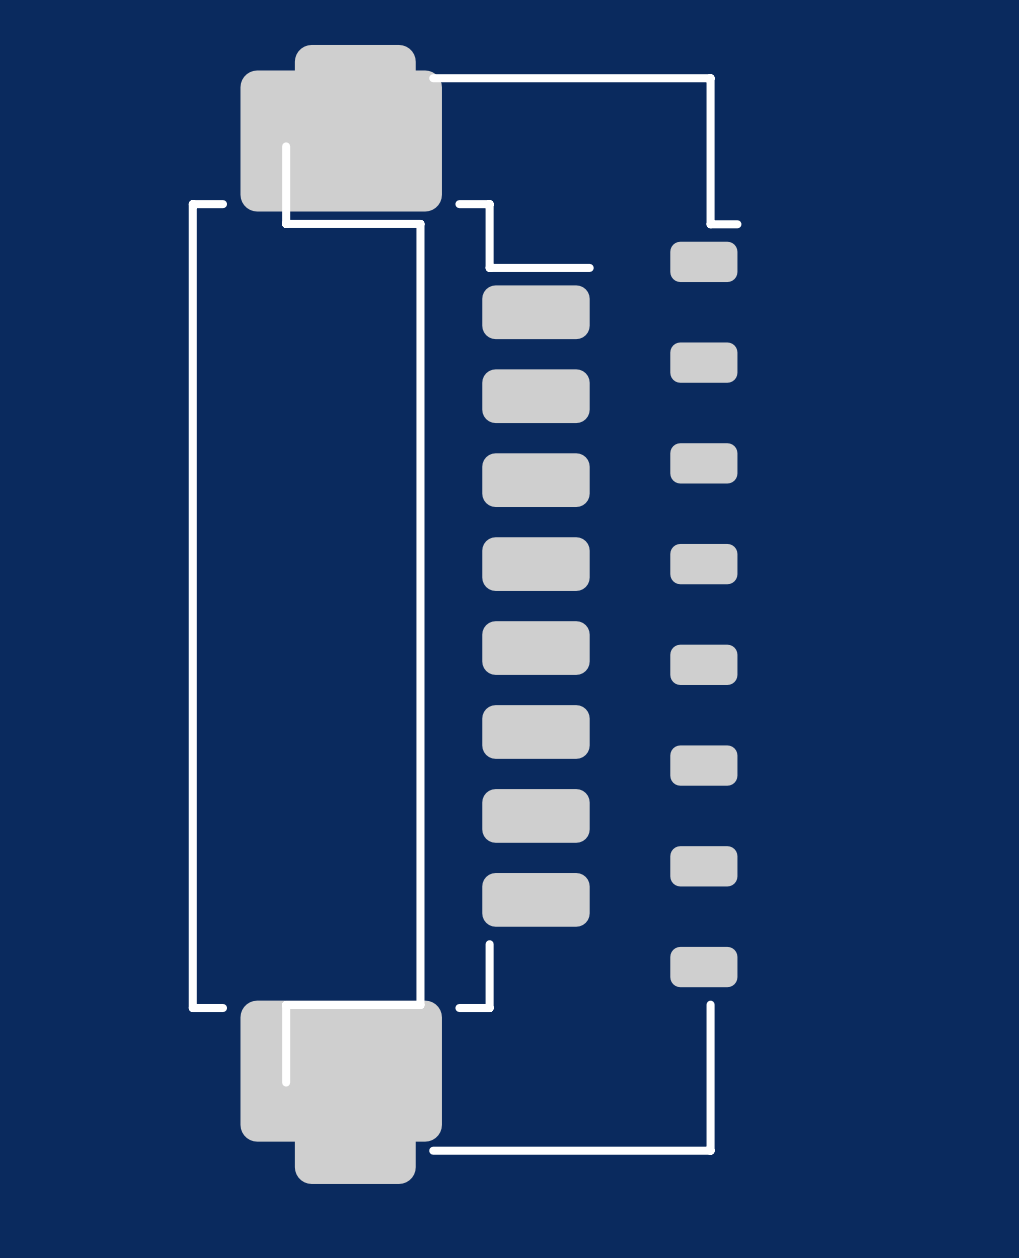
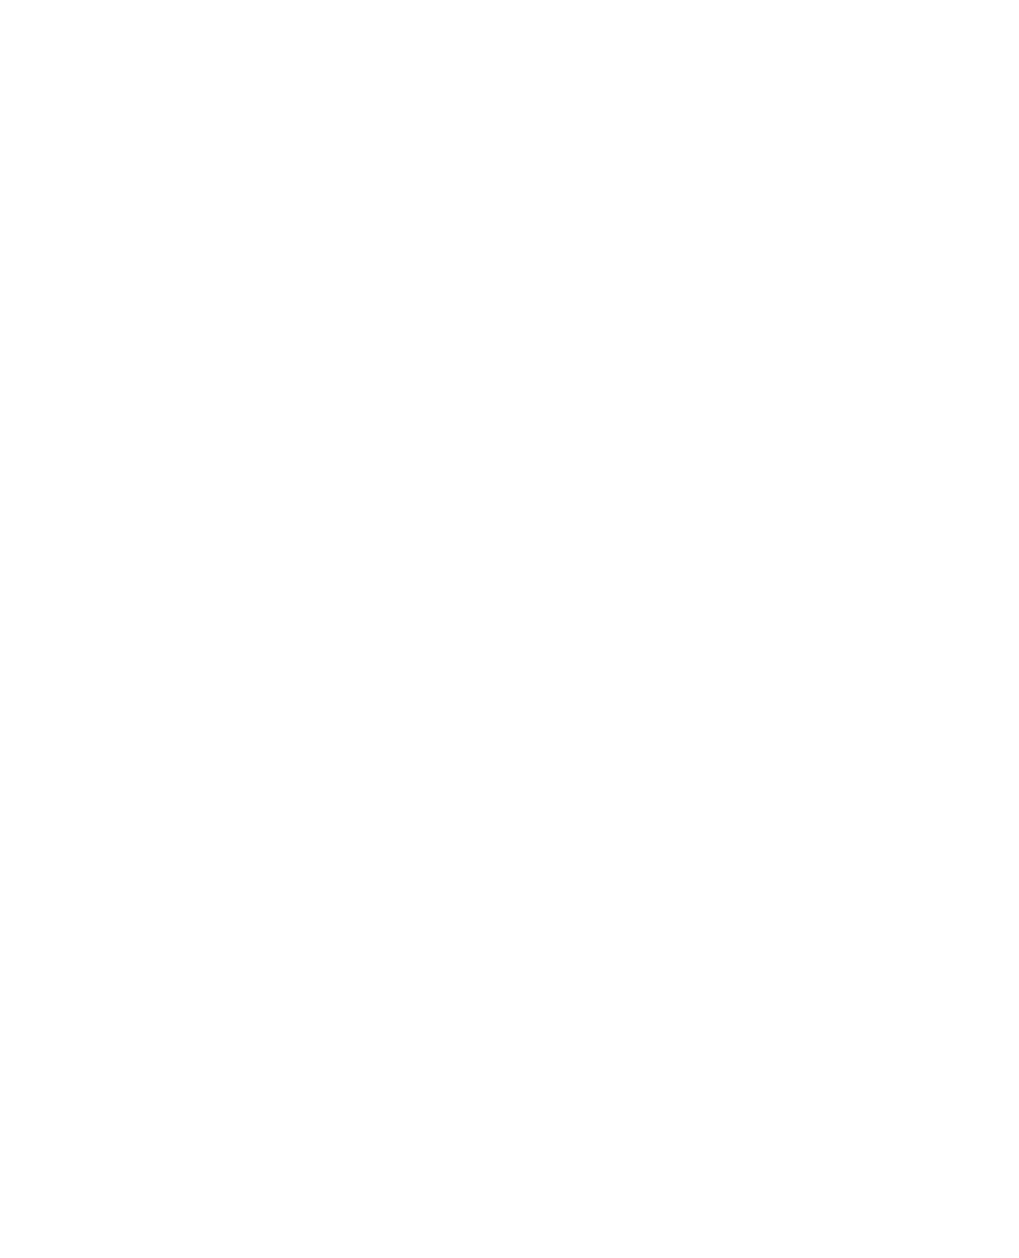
part: (391, 606) -> none
part: (511, 614) -> none

